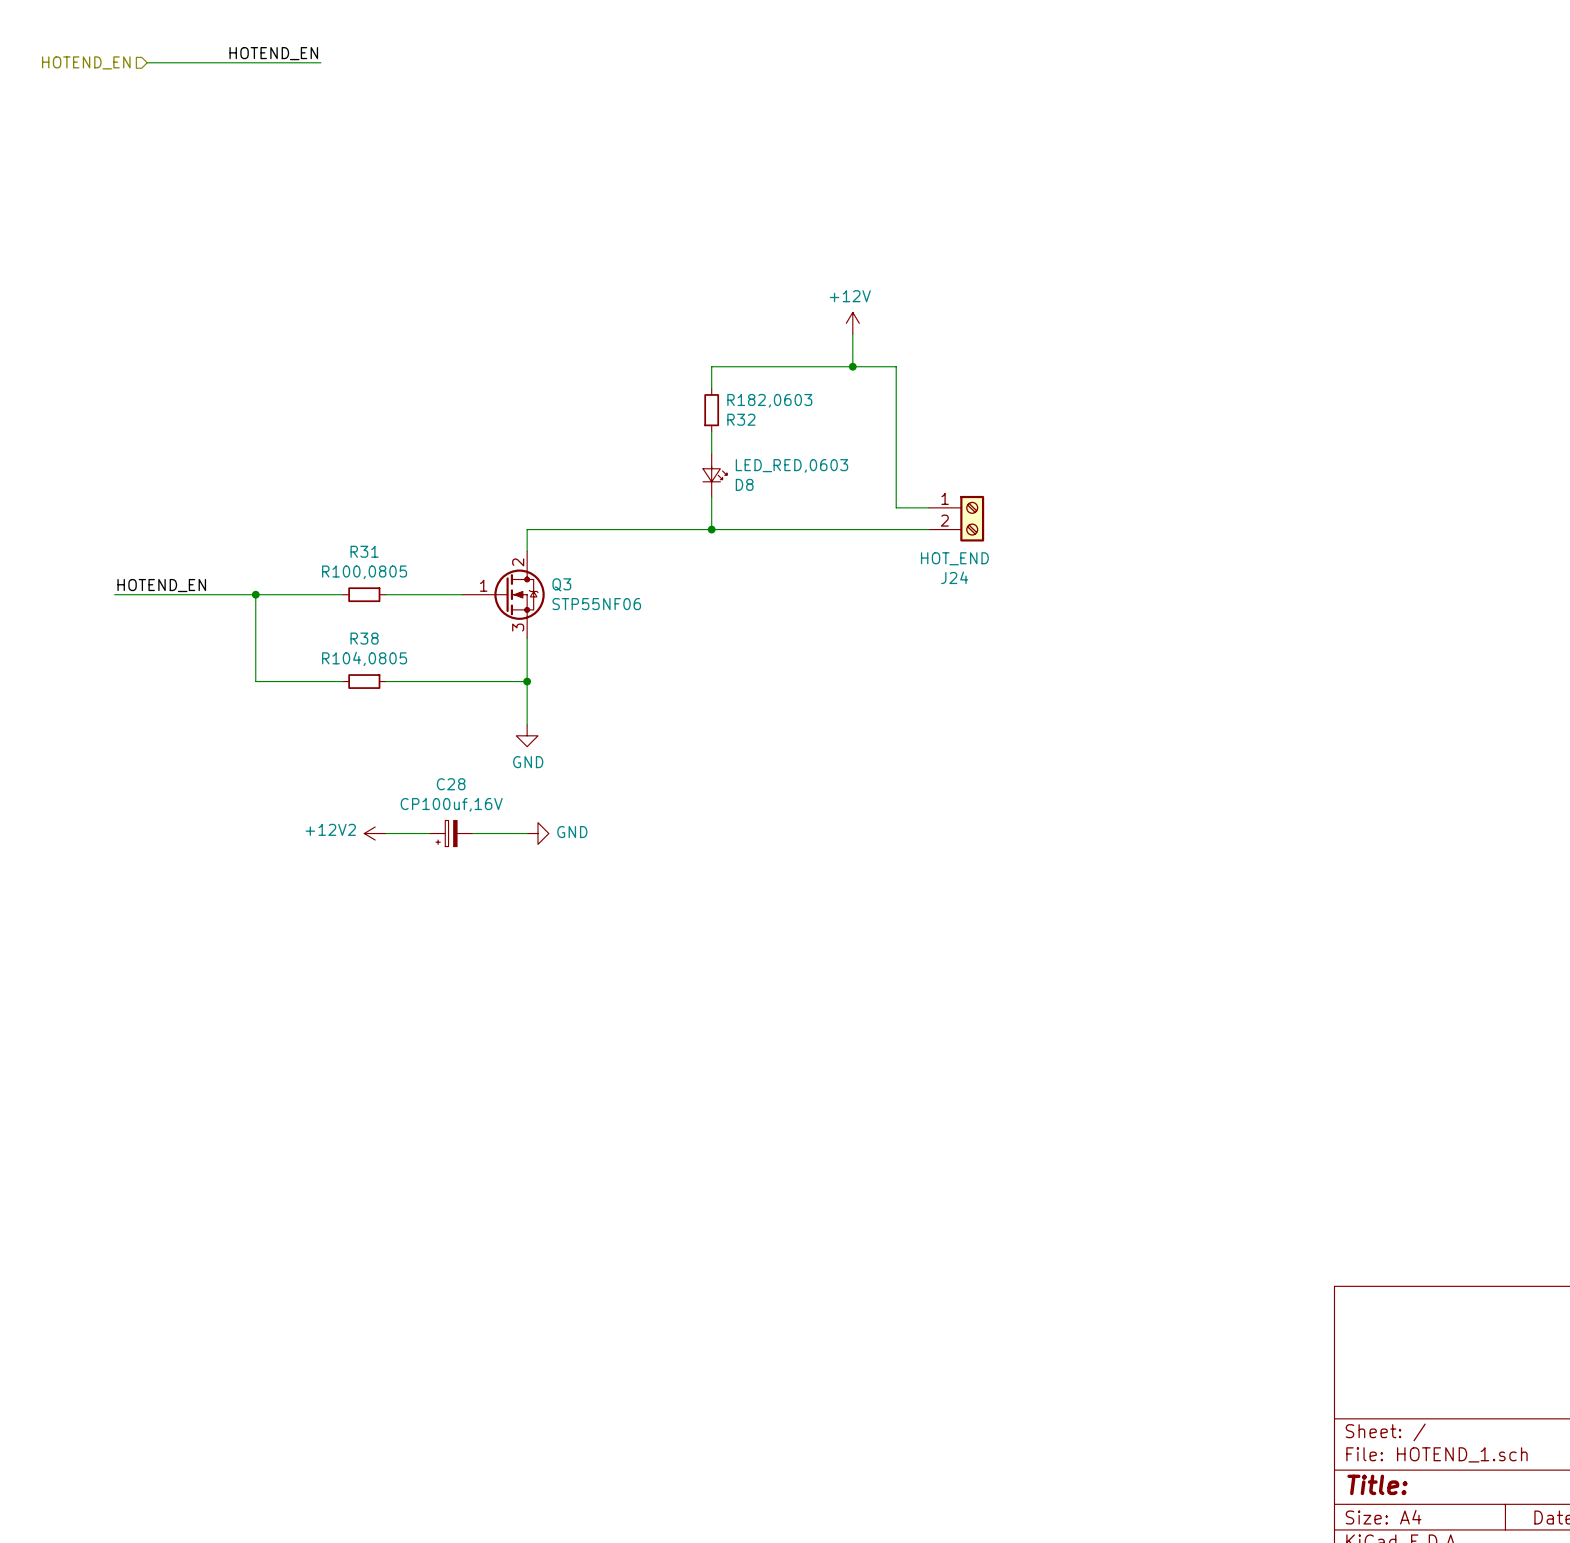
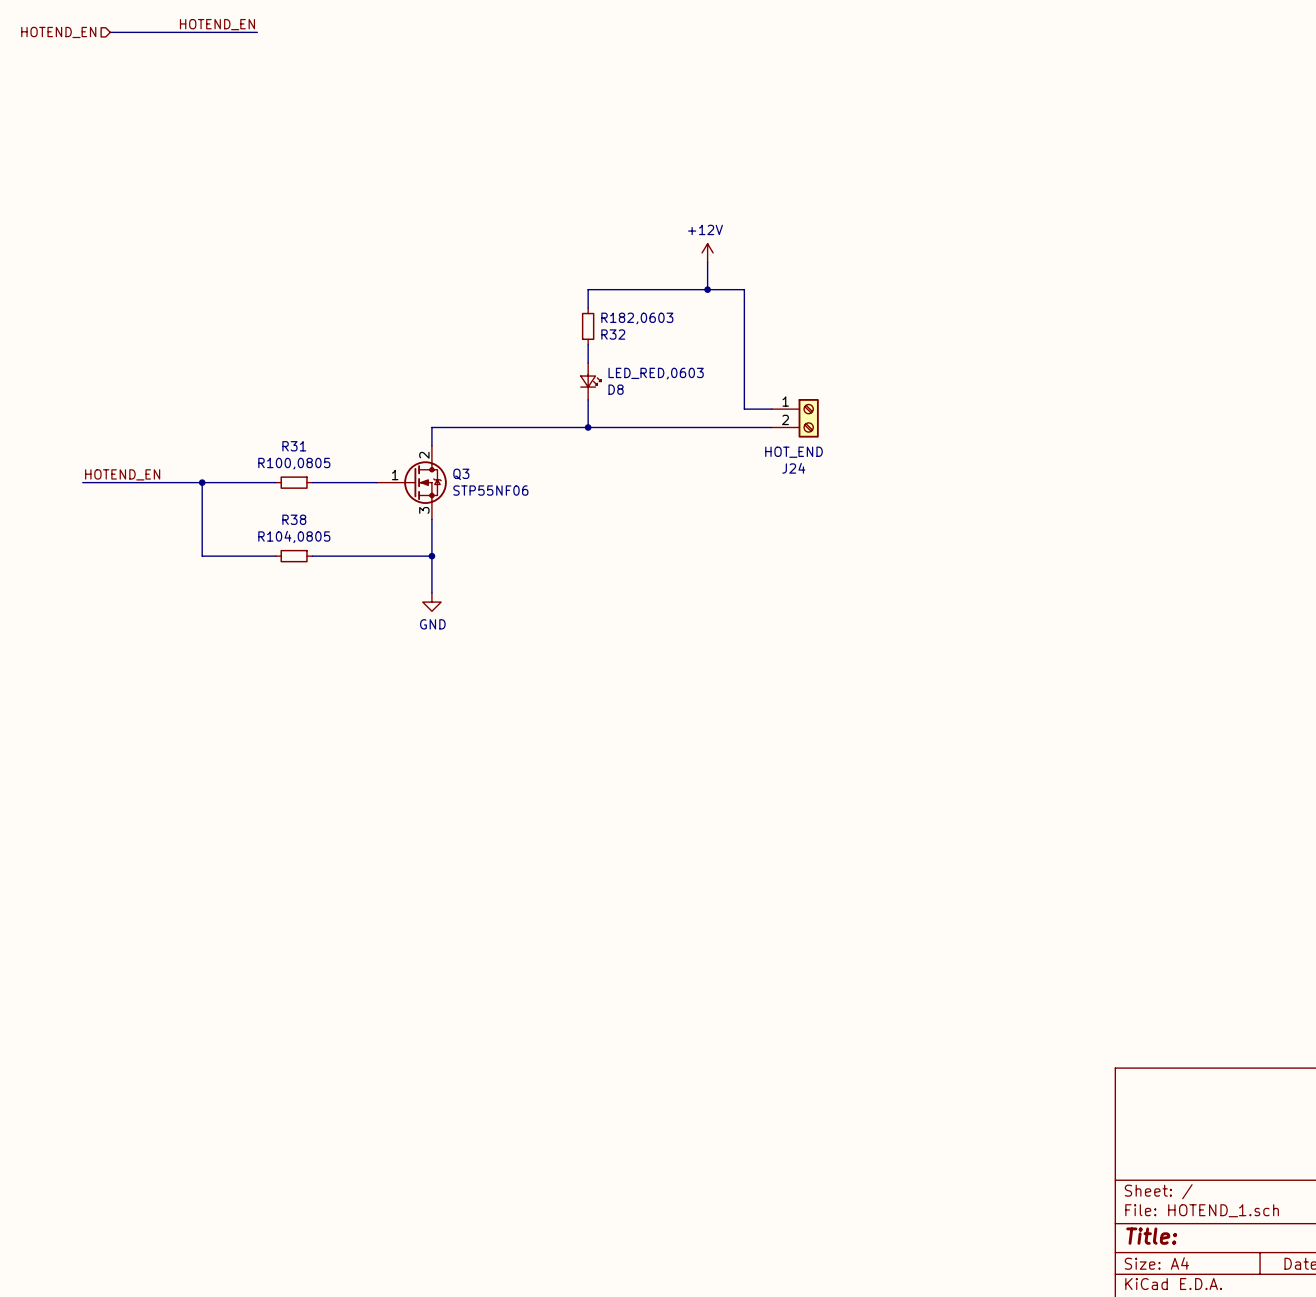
power symbol: +12V2 (375, 833) -> none
wire: (386, 833) (429, 833) -> none
C28: CP100uf,16V (451, 833) -> none
wire: (472, 833) (527, 833) -> none
power symbol: GND (537, 833) -> none

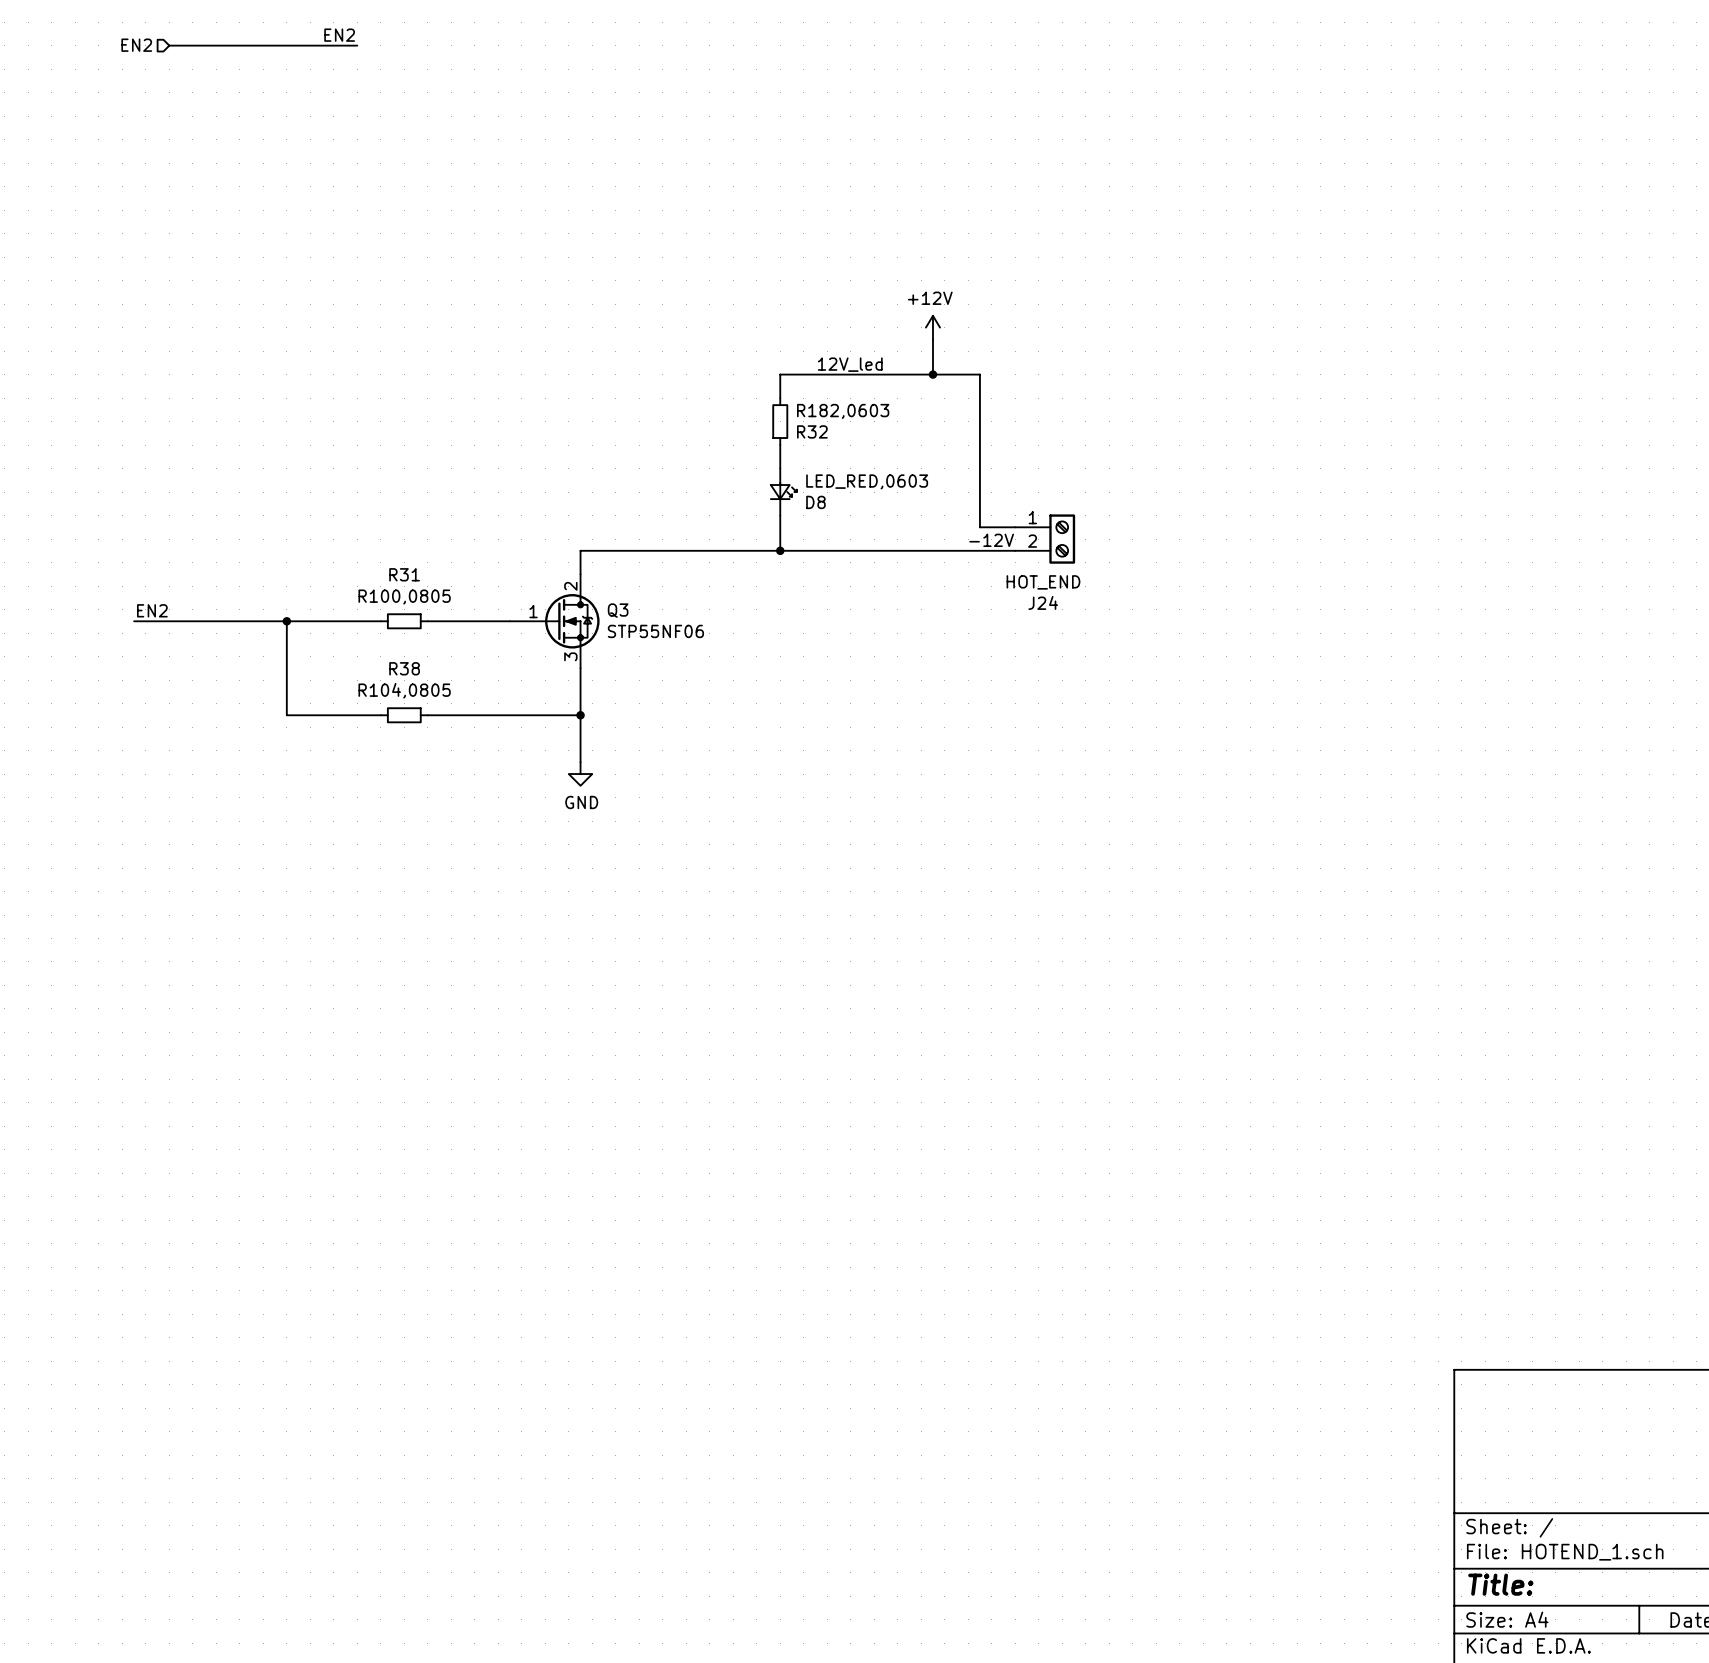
label: HOTEND_EN (217, 24) -> EN2 (339, 35)
hierarchical label: HOTEND_EN (58, 32) -> EN2 (136, 45)
label: none -> 12V_led (850, 364)
label: none -> -12V (991, 540)
label: HOTEND_EN (122, 474) -> EN2 (152, 610)

